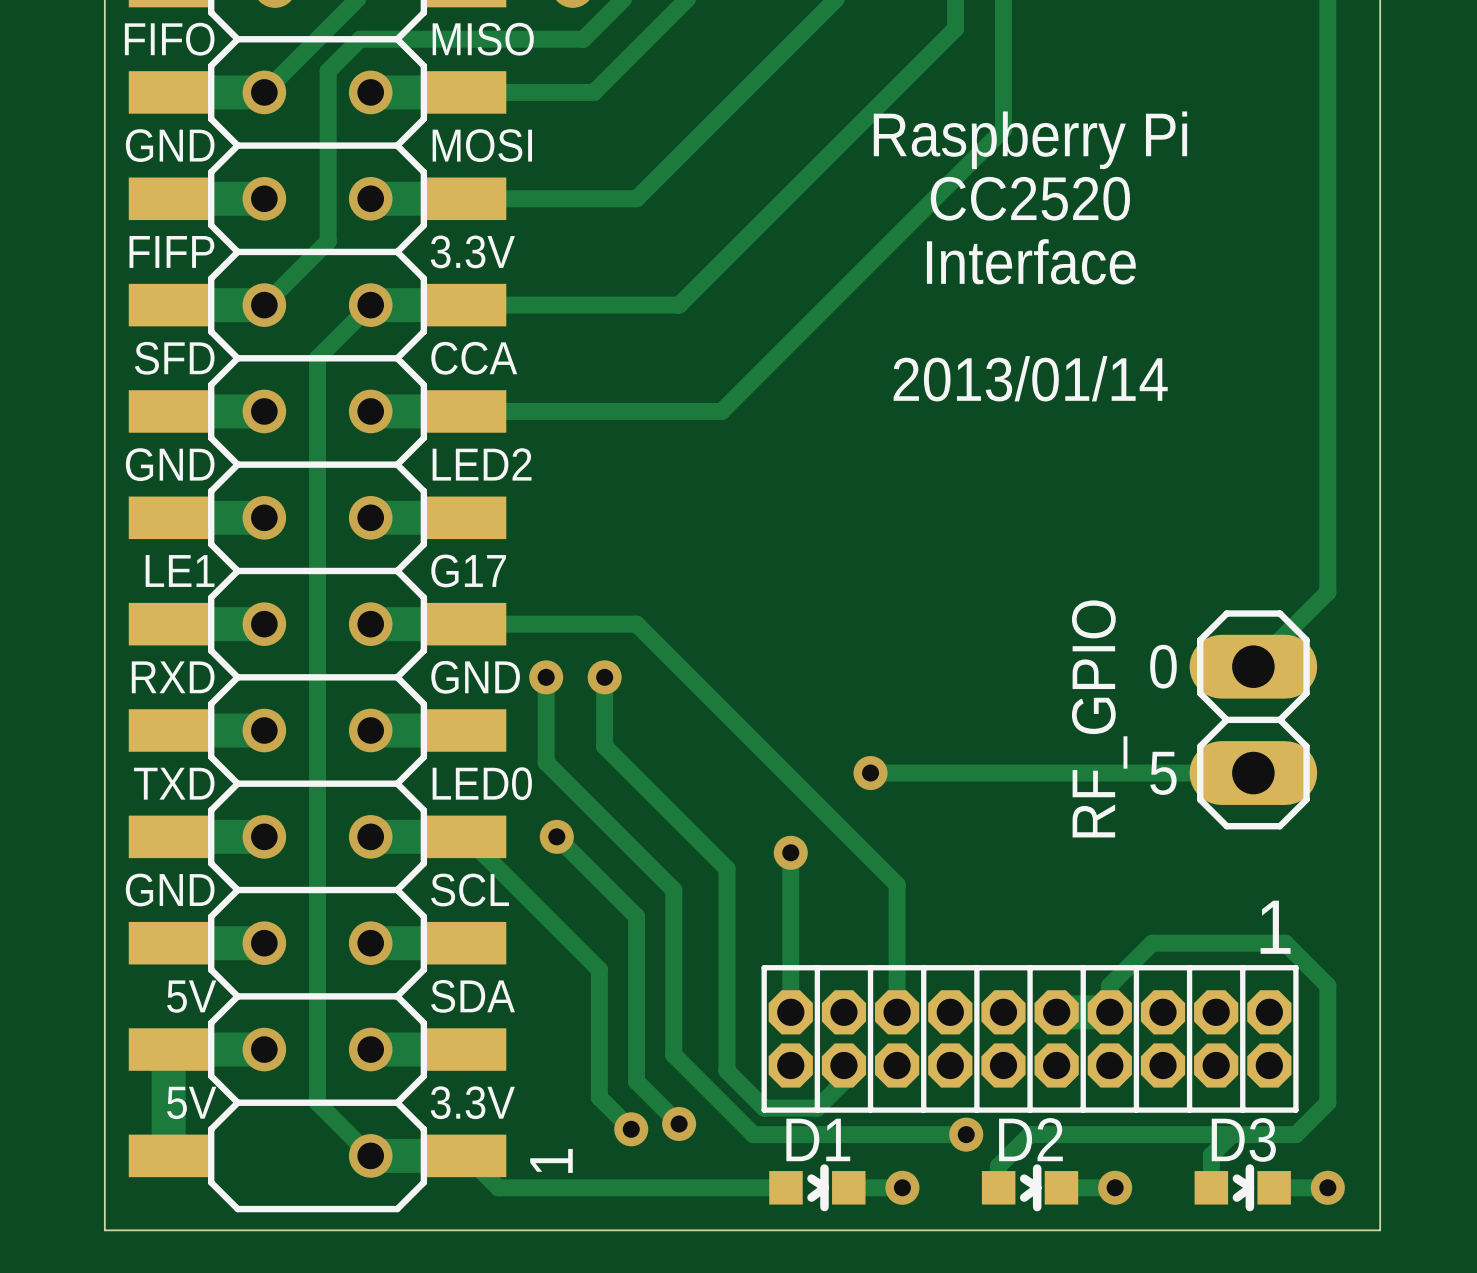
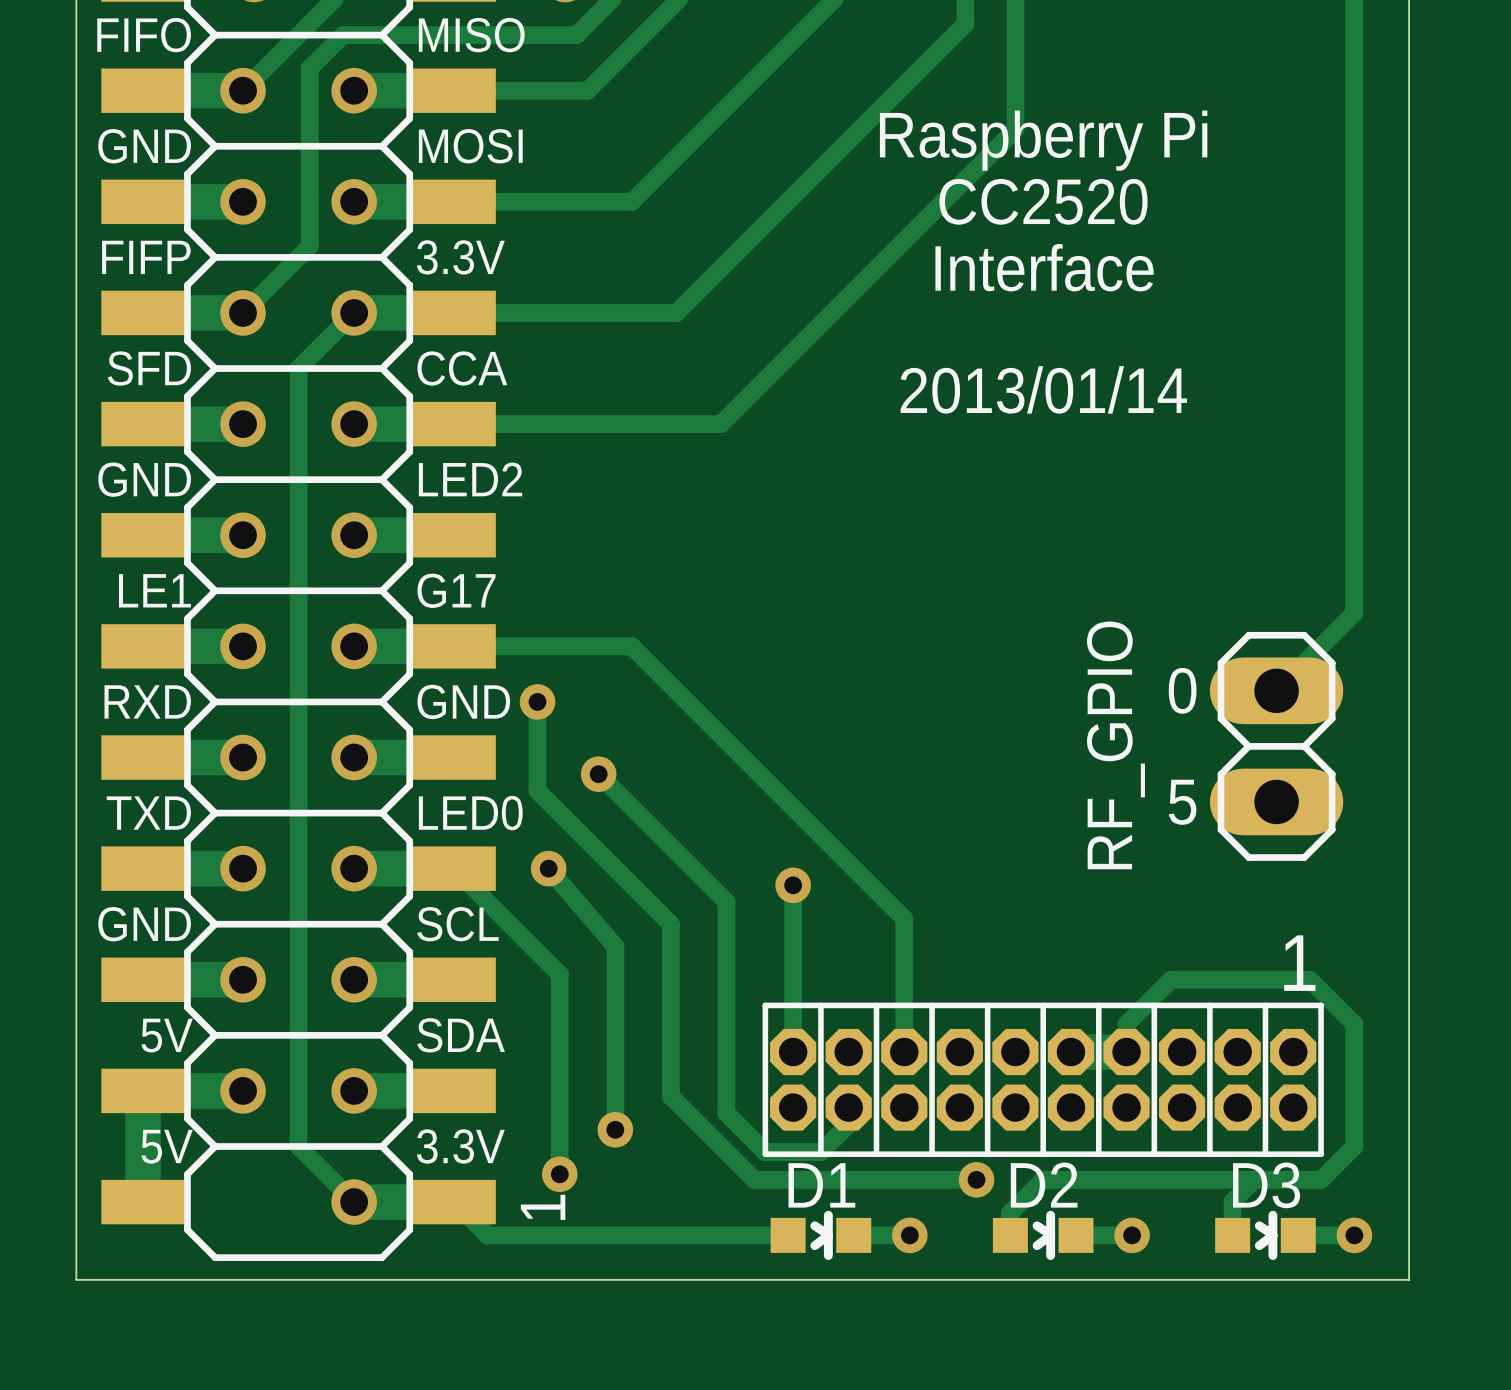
track: (604, 677) (604, 746) -> none
via position: (604, 677) -> (598, 774)
track: (870, 773) (1253, 773) -> none
via: (870, 773) -> none
track: (556, 836) (636, 916) (636, 1081) (679, 1123) -> (548, 868) (615, 946) (615, 1129)
track: (567, 937) (599, 969) (599, 1097) (631, 1129) -> (559, 974) (559, 1174)
via: none -> (615, 1129)
via: (679, 1123) -> none
via: none -> (559, 1174)
via: (631, 1129) -> none

